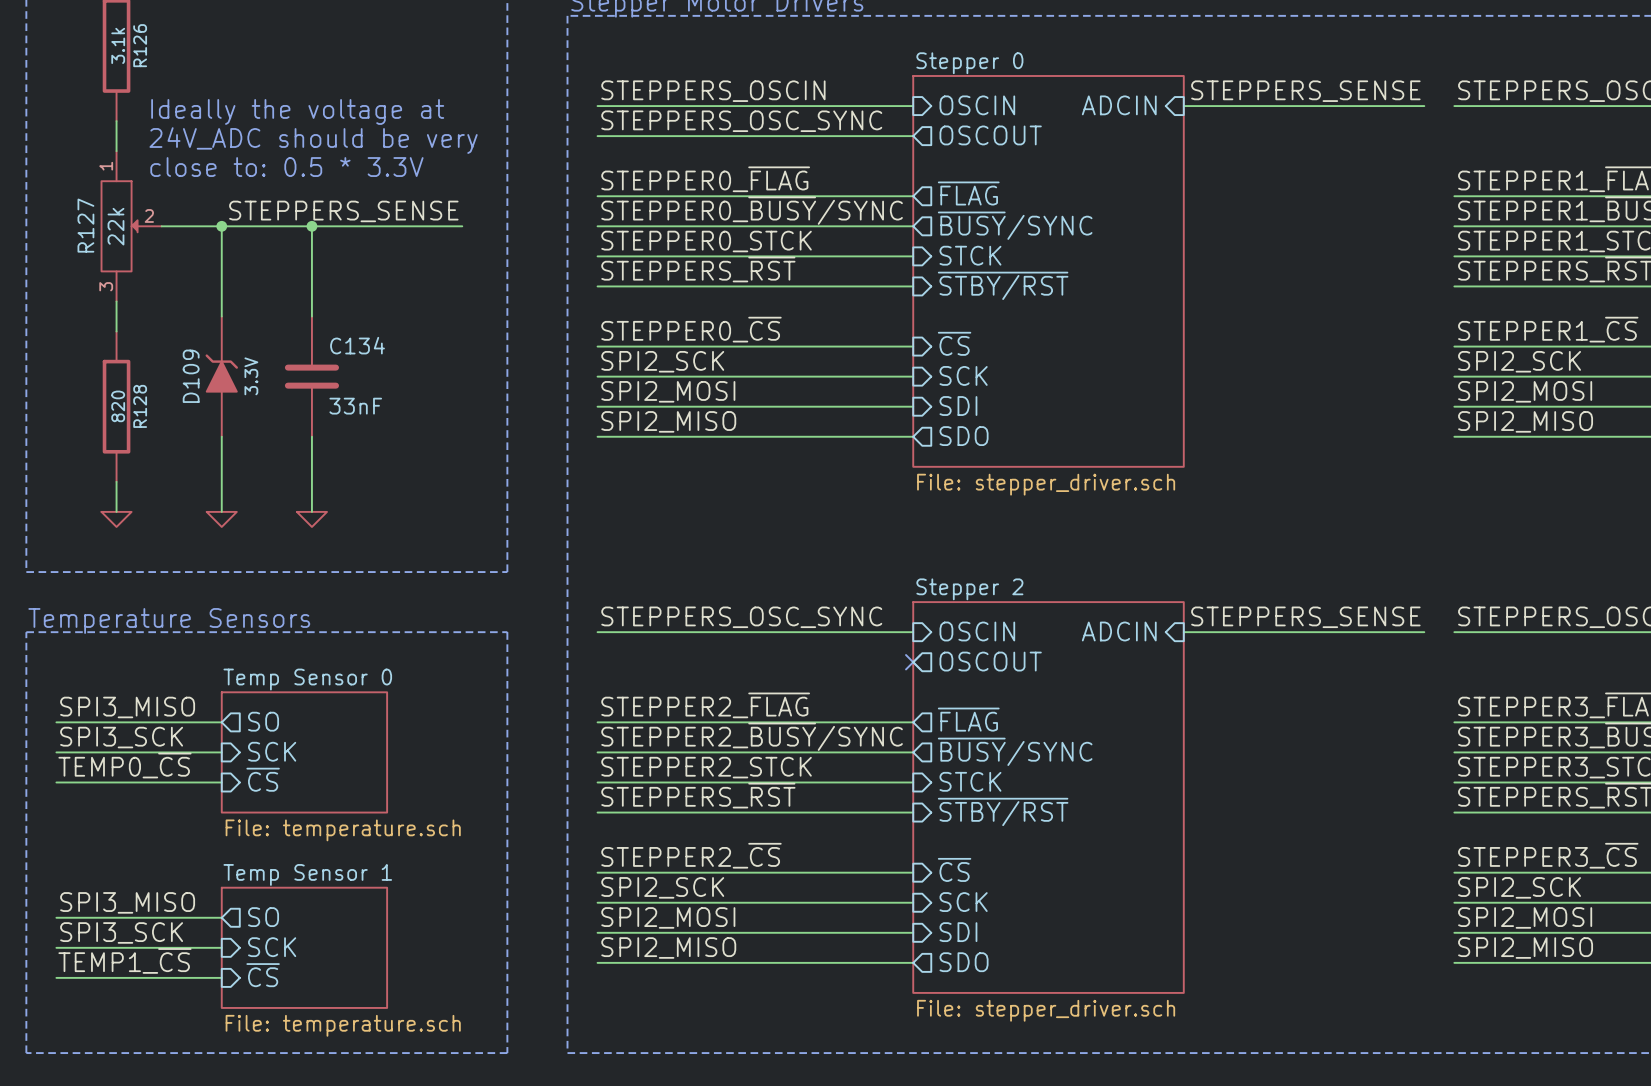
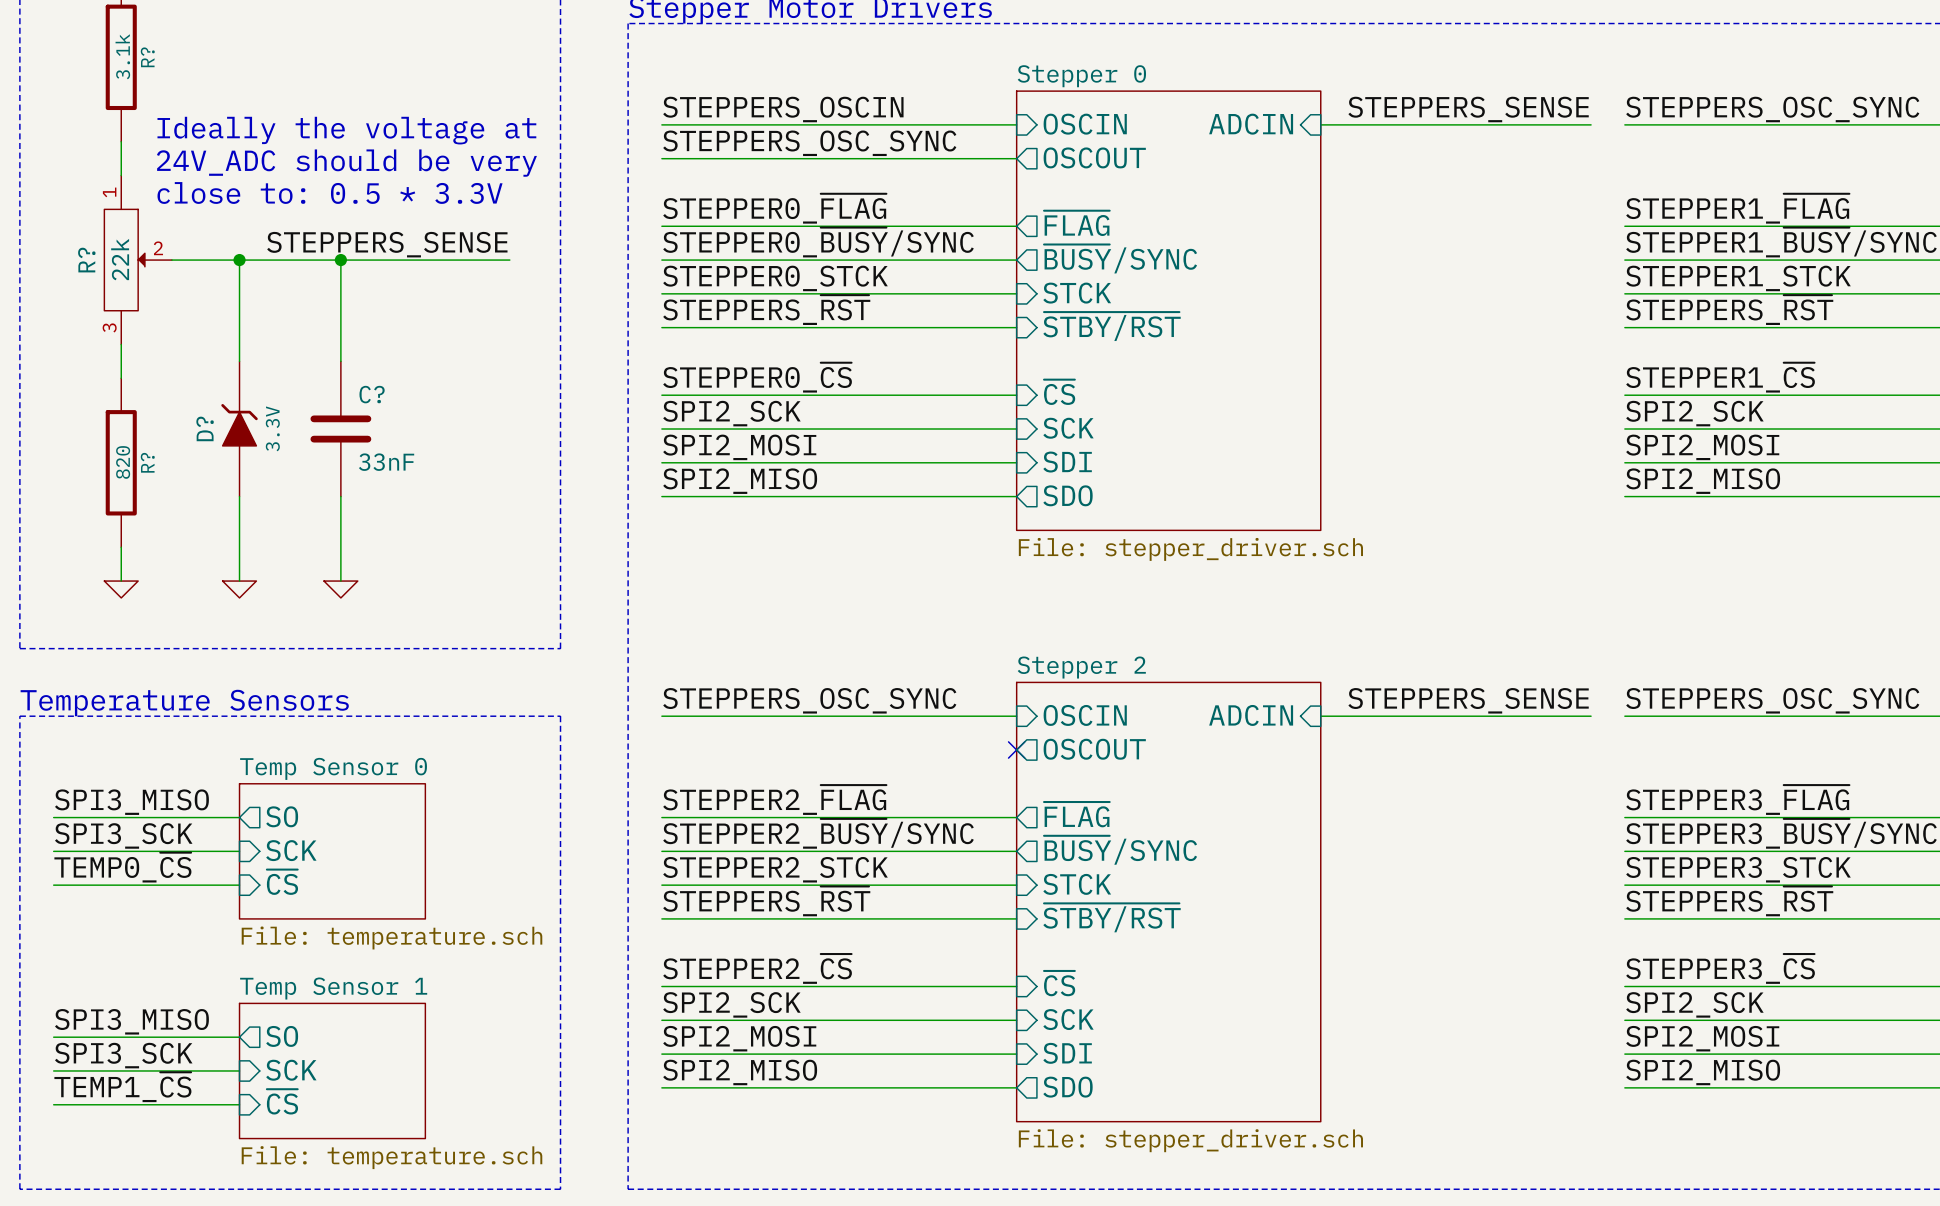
R126 name: R126 (140, 45) -> R? (147, 57)
R127 name: R127 (85, 225) -> R? (86, 260)
C134 name: C134 (357, 345) -> C? (372, 394)
D109 name: D109 (191, 376) -> D? (205, 428)
R128 name: R128 (140, 406) -> R? (147, 462)

